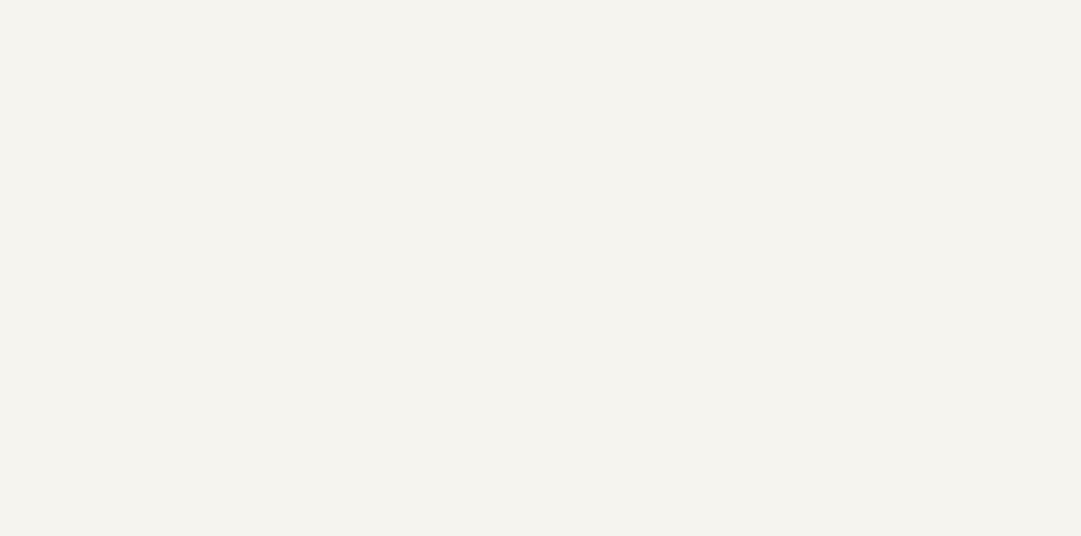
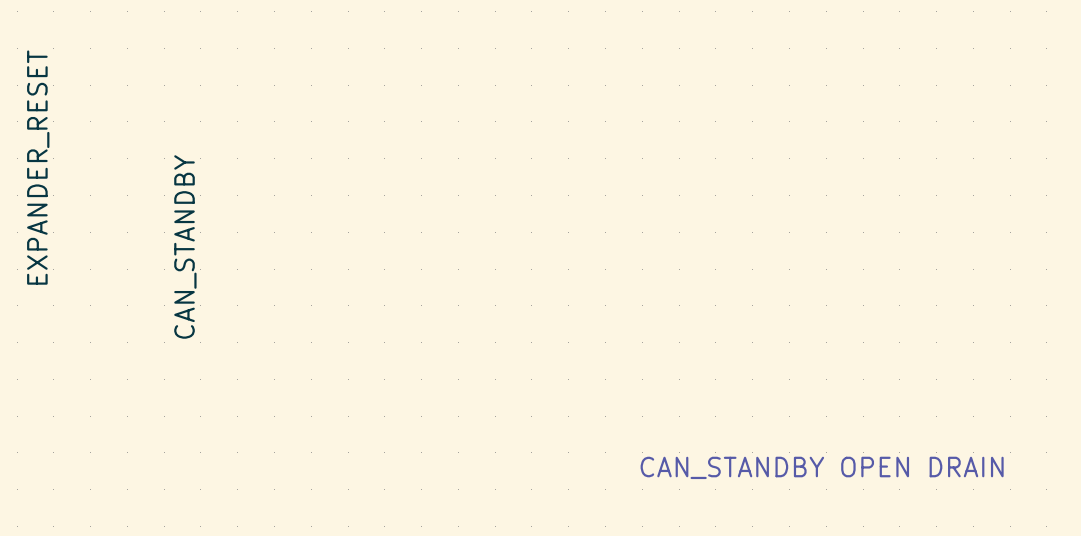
label: none -> EXPANDER_RESET (38, 167)
label: none -> CAN_STANDBY (185, 246)
text: none -> CAN_STANDBY OPEN DRAIN (822, 467)

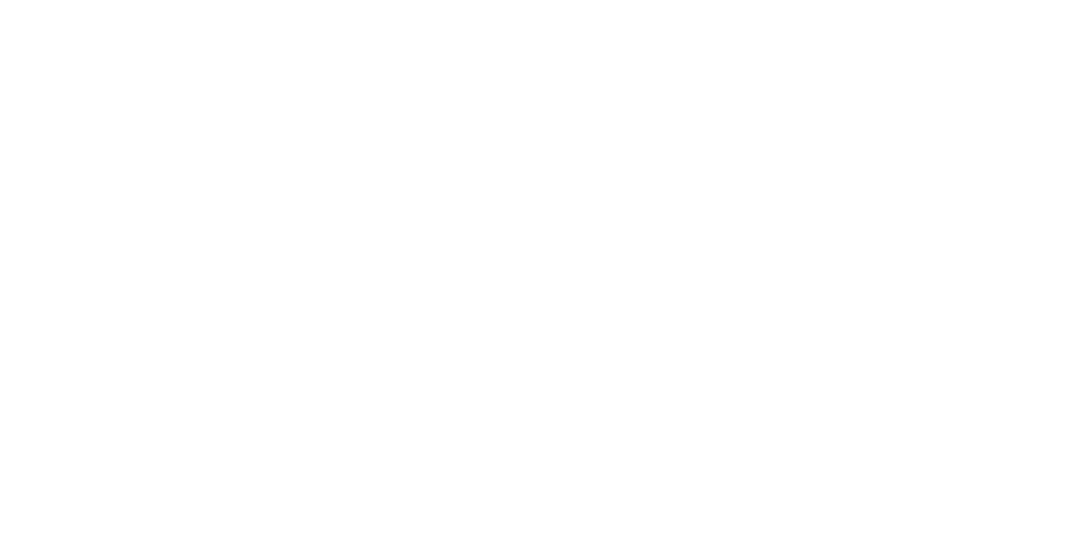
label: EXPANDER_RESET (38, 167) -> none
label: CAN_STANDBY (185, 246) -> none
text: CAN_STANDBY OPEN DRAIN (822, 467) -> none

